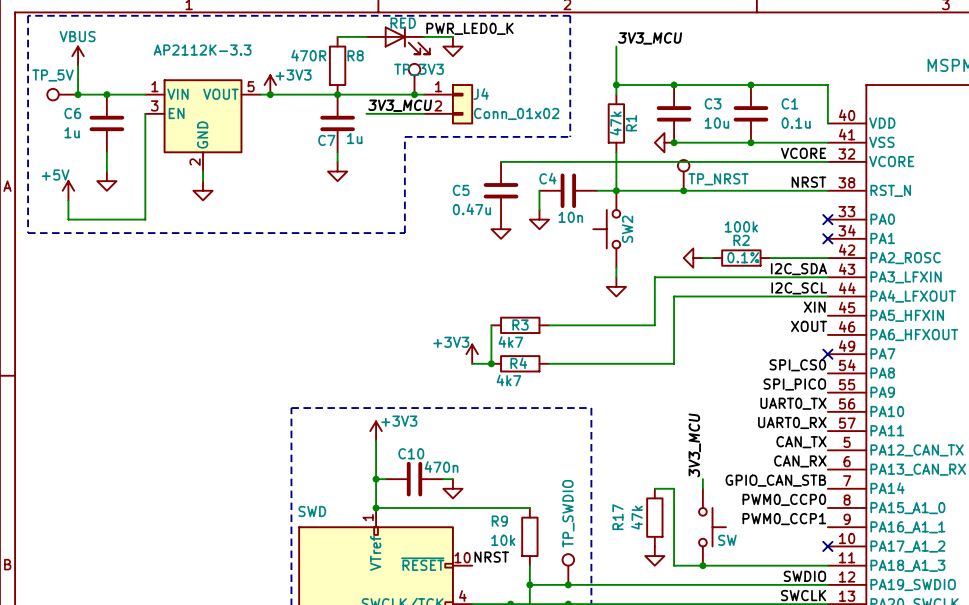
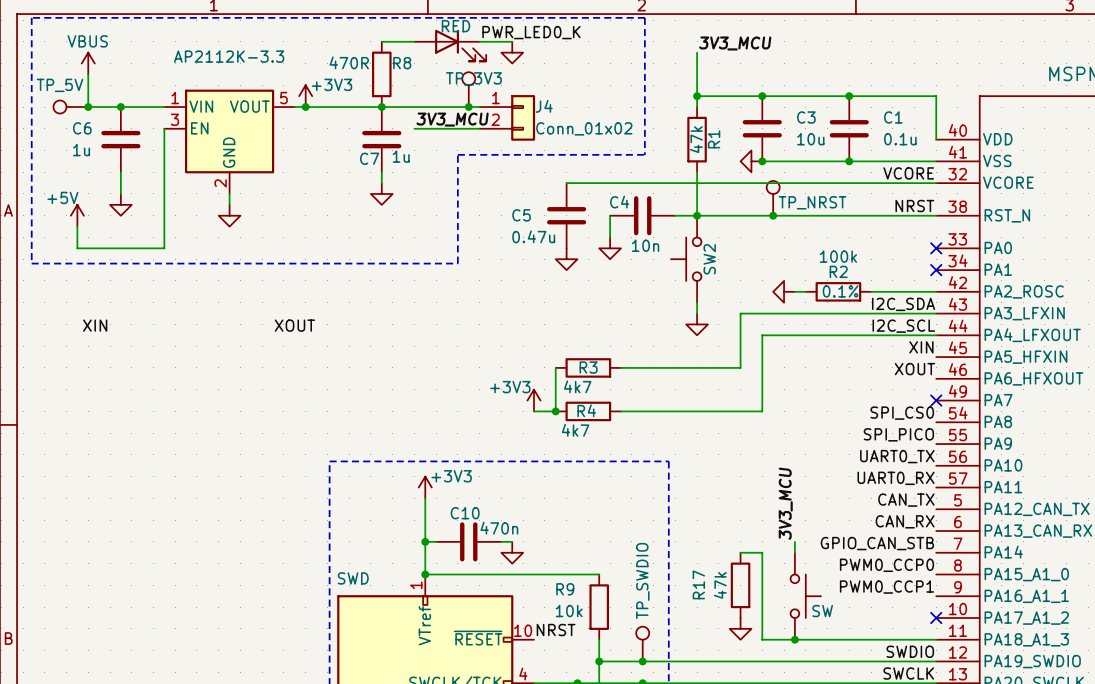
label: none -> XIN (95, 325)
label: none -> XOUT (294, 325)

